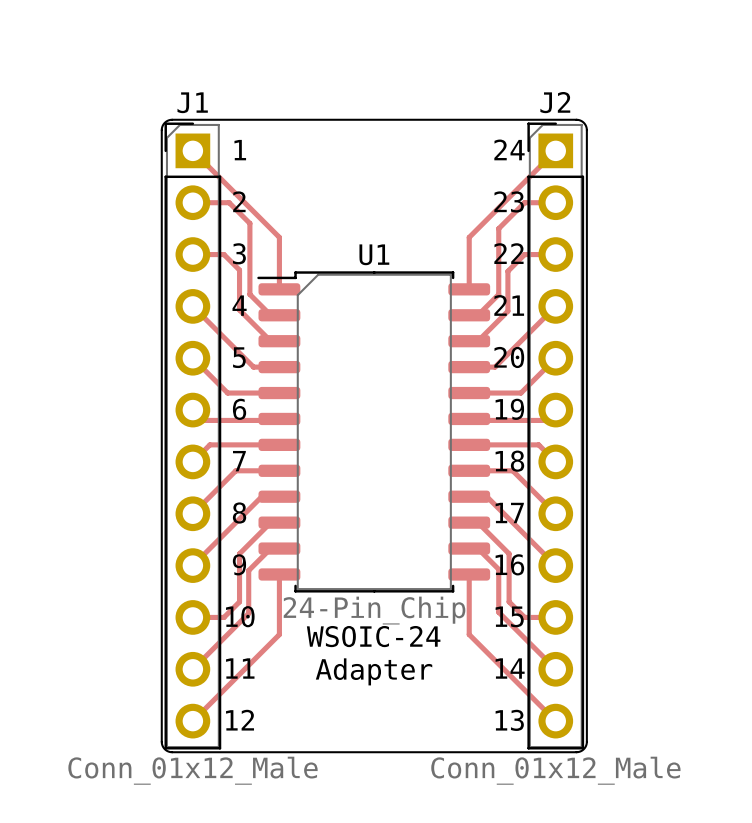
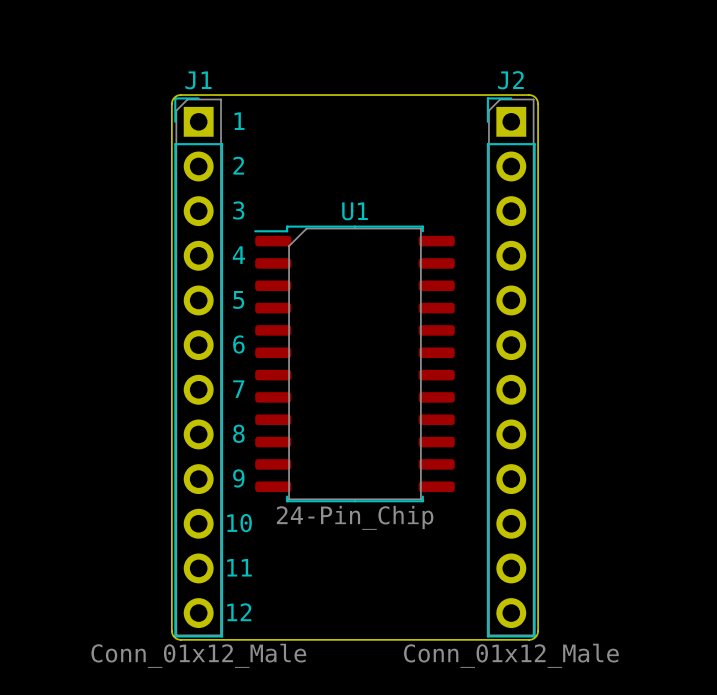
text: 24 (509, 149) -> none
track: (192, 150) (279, 237) (279, 289) -> none
track: (555, 150) (469, 237) (469, 289) -> none
text: 23 (509, 201) -> none
track: (192, 202) (229, 202) (249, 223) (249, 294) (270, 315) (279, 315) -> none
track: (555, 202) (524, 202) (498, 228) (498, 294) (477, 315) (469, 315) -> none
text: 22 (508, 253) -> none
track: (192, 254) (223, 254) (239, 270) (239, 310) (270, 341) (279, 341) -> none
track: (555, 254) (524, 254) (507, 271) (507, 311) (477, 341) (469, 341) -> none
text: 21 (509, 305) -> none
track: (192, 306) (253, 367) (279, 367) -> none
track: (555, 306) (495, 367) (469, 367) -> none
text: 20 (509, 357) -> none
track: (192, 358) (227, 393) (279, 393) -> none
track: (555, 358) (520, 393) (469, 393) -> none
text: 19 (509, 409) -> none
track: (192, 410) (203, 420) (279, 418) -> none
track: (555, 410) (545, 420) (469, 418) -> none
track: (279, 444) (209, 444) (192, 461) -> none
track: (469, 444) (538, 444) (555, 461) -> none
text: 18 (509, 461) -> none
track: (279, 470) (235, 470) (192, 513) -> none
track: (469, 470) (512, 470) (555, 513) -> none
track: (279, 496) (261, 496) (192, 565) -> none
track: (469, 496) (486, 496) (555, 565) -> none
text: 17 (509, 512) -> none
track: (279, 522) (270, 522) (239, 553) (239, 601) (223, 617) (192, 617) -> none
track: (469, 522) (477, 522) (509, 553) (509, 601) (524, 617) (555, 617) -> none
track: (279, 548) (270, 548) (248, 570) (248, 613) (192, 669) -> none
track: (469, 548) (477, 548) (498, 569) (498, 612) (555, 669) -> none
text: 16 (509, 564) -> none
track: (279, 574) (279, 634) (192, 721) -> none
track: (469, 574) (469, 634) (555, 721) -> none
text: 15 (509, 616) -> none
text: WSOIC-24 (373, 636) -> none
text: 14 (510, 668) -> none
text: Adapter (374, 671) -> none
text: 13 (509, 720) -> none

